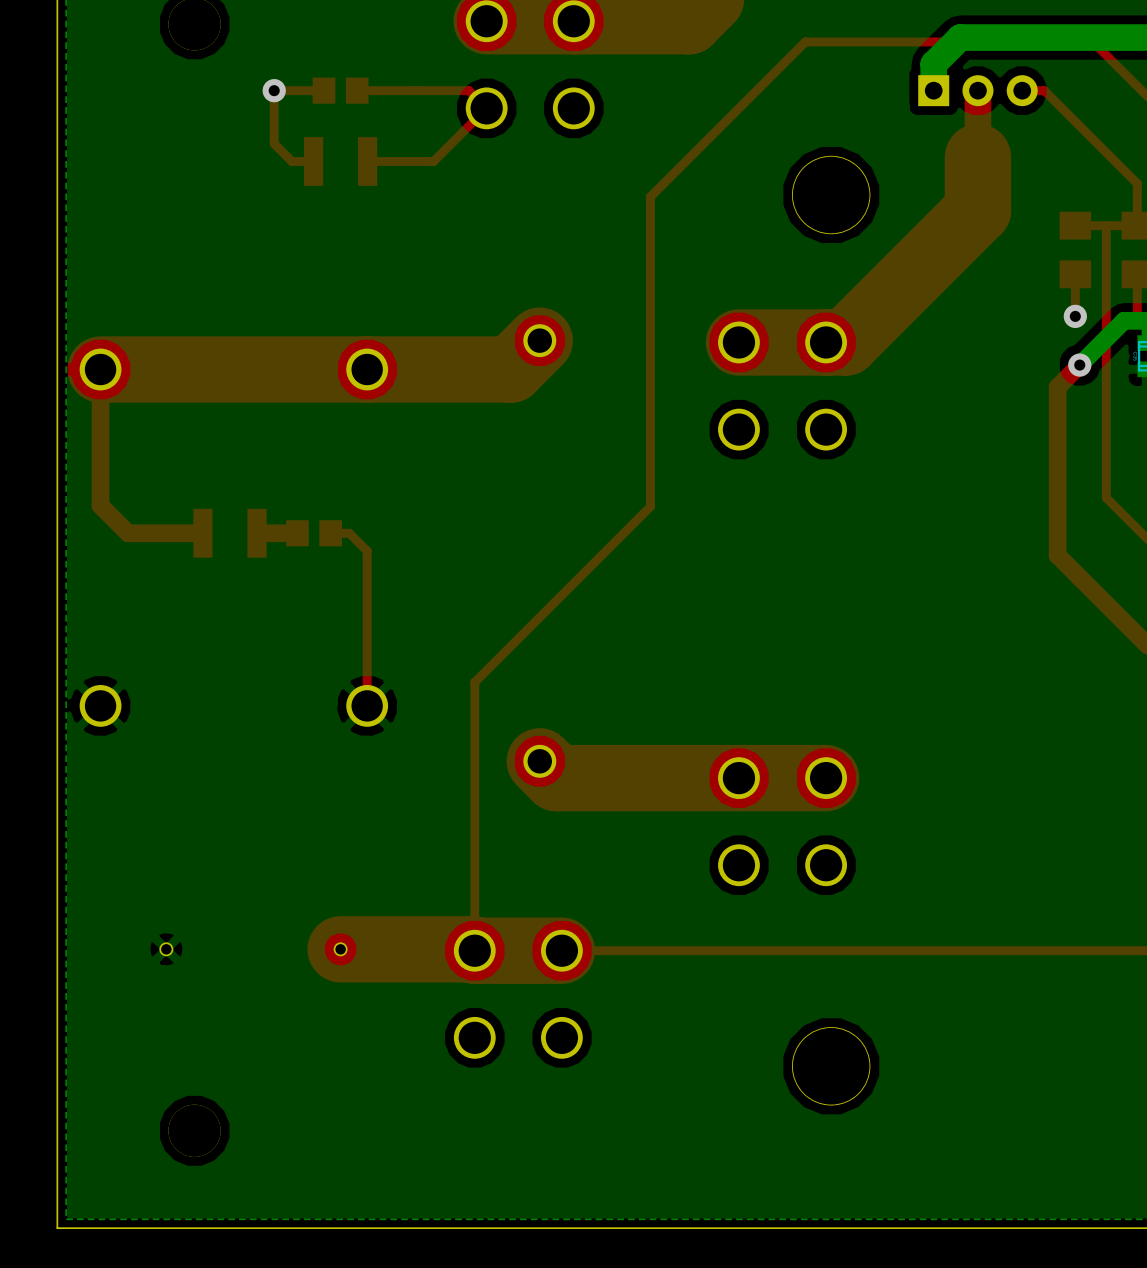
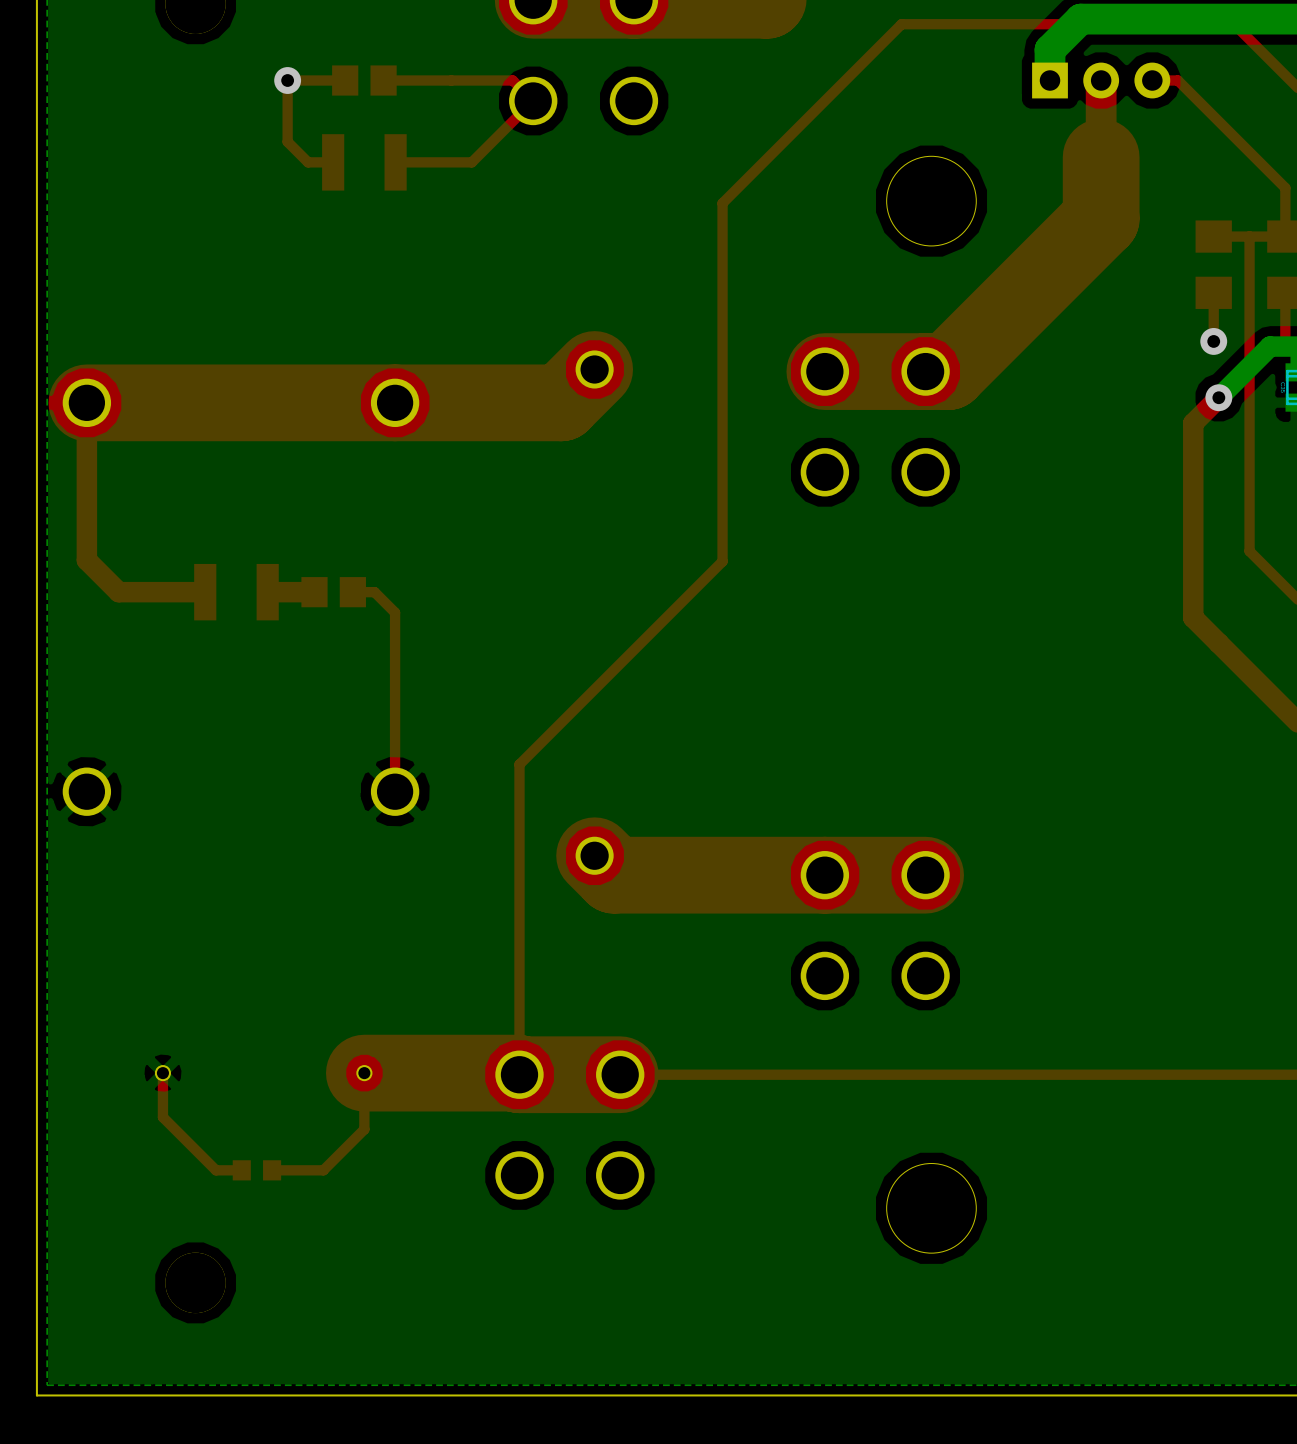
top track: none -> (162, 1073) (162, 1117) (216, 1170) (241, 1170)
top track: none -> (364, 1073) (364, 1129) (323, 1170) (272, 1170)
part: none -> (256, 1170)

